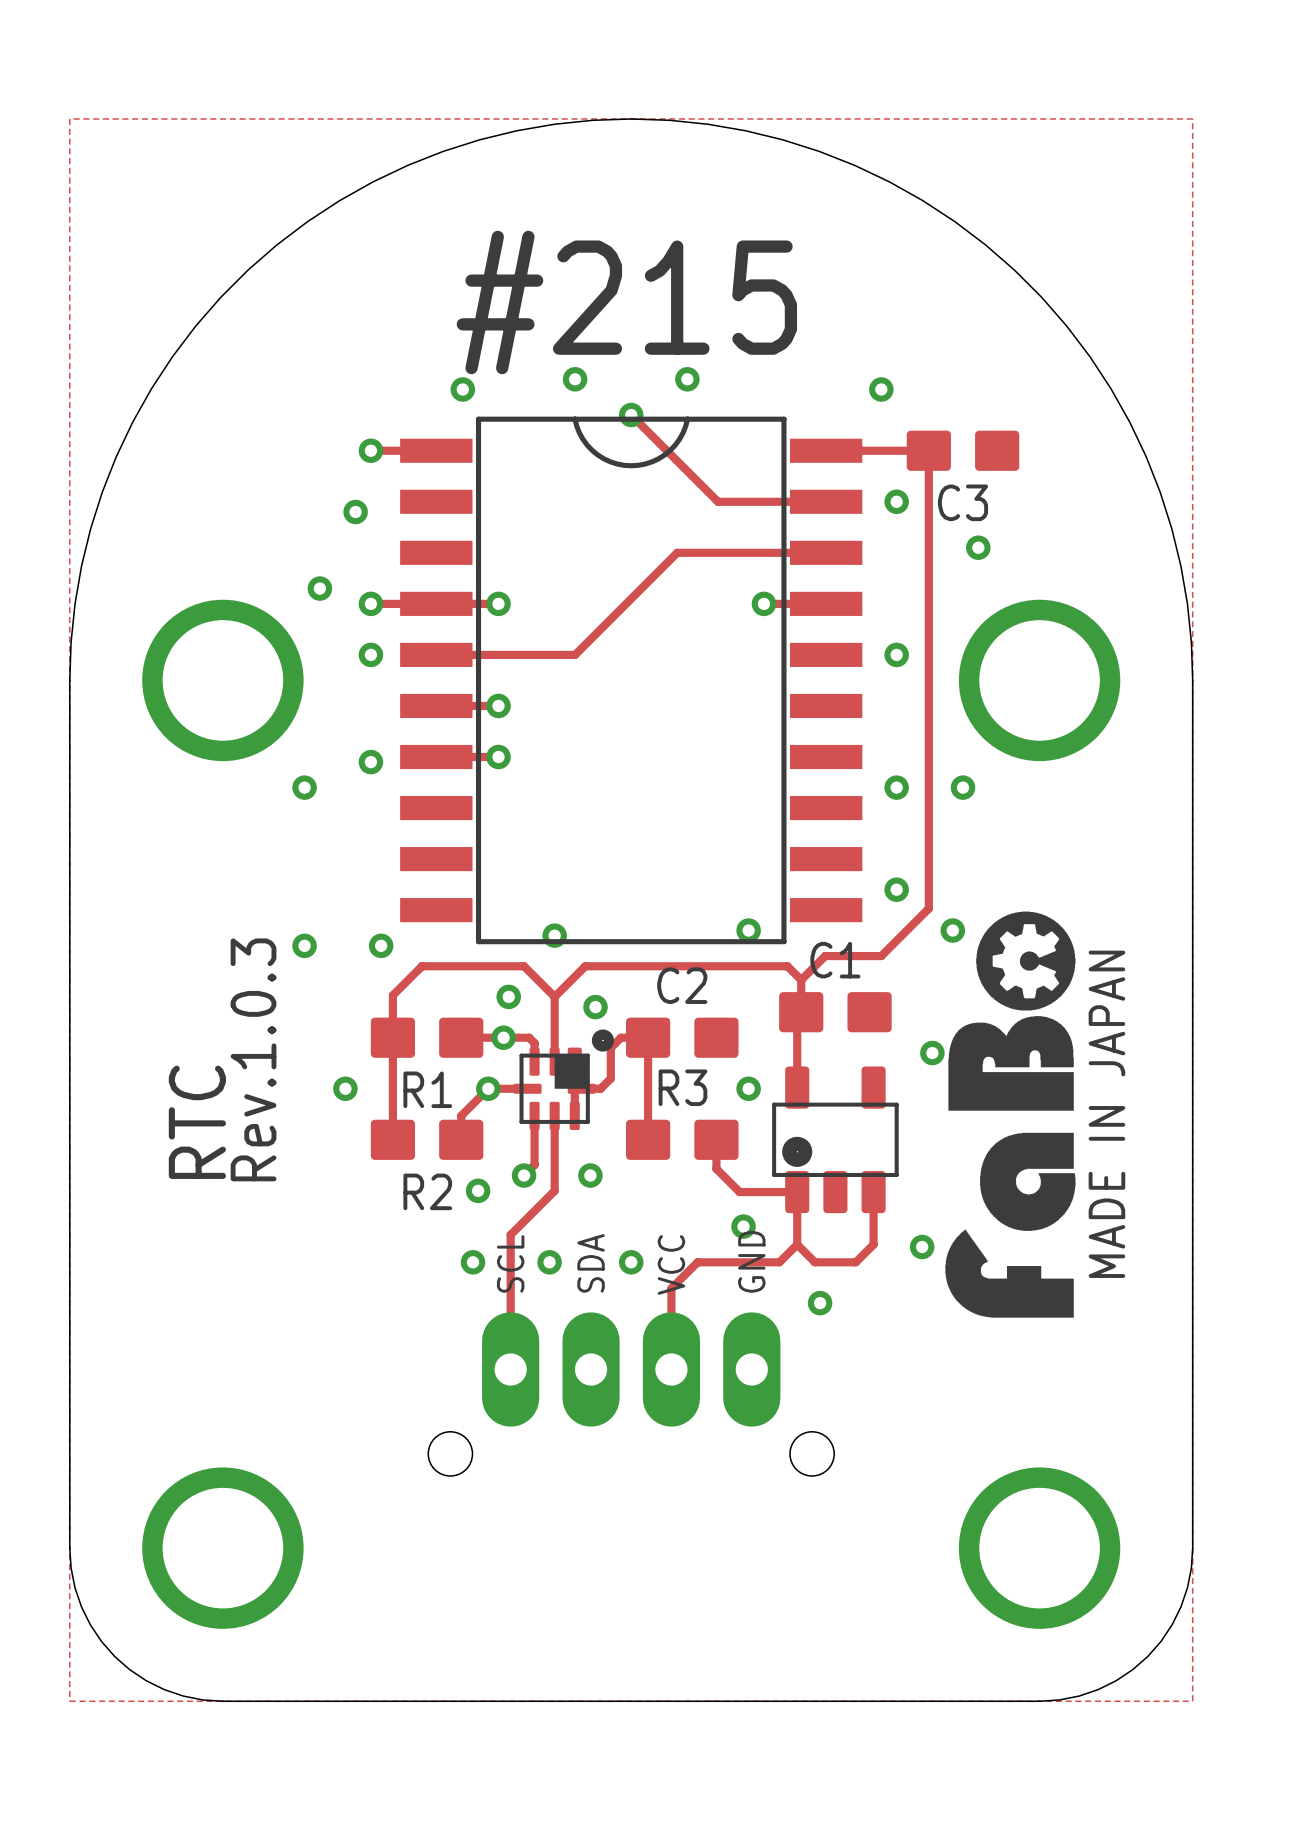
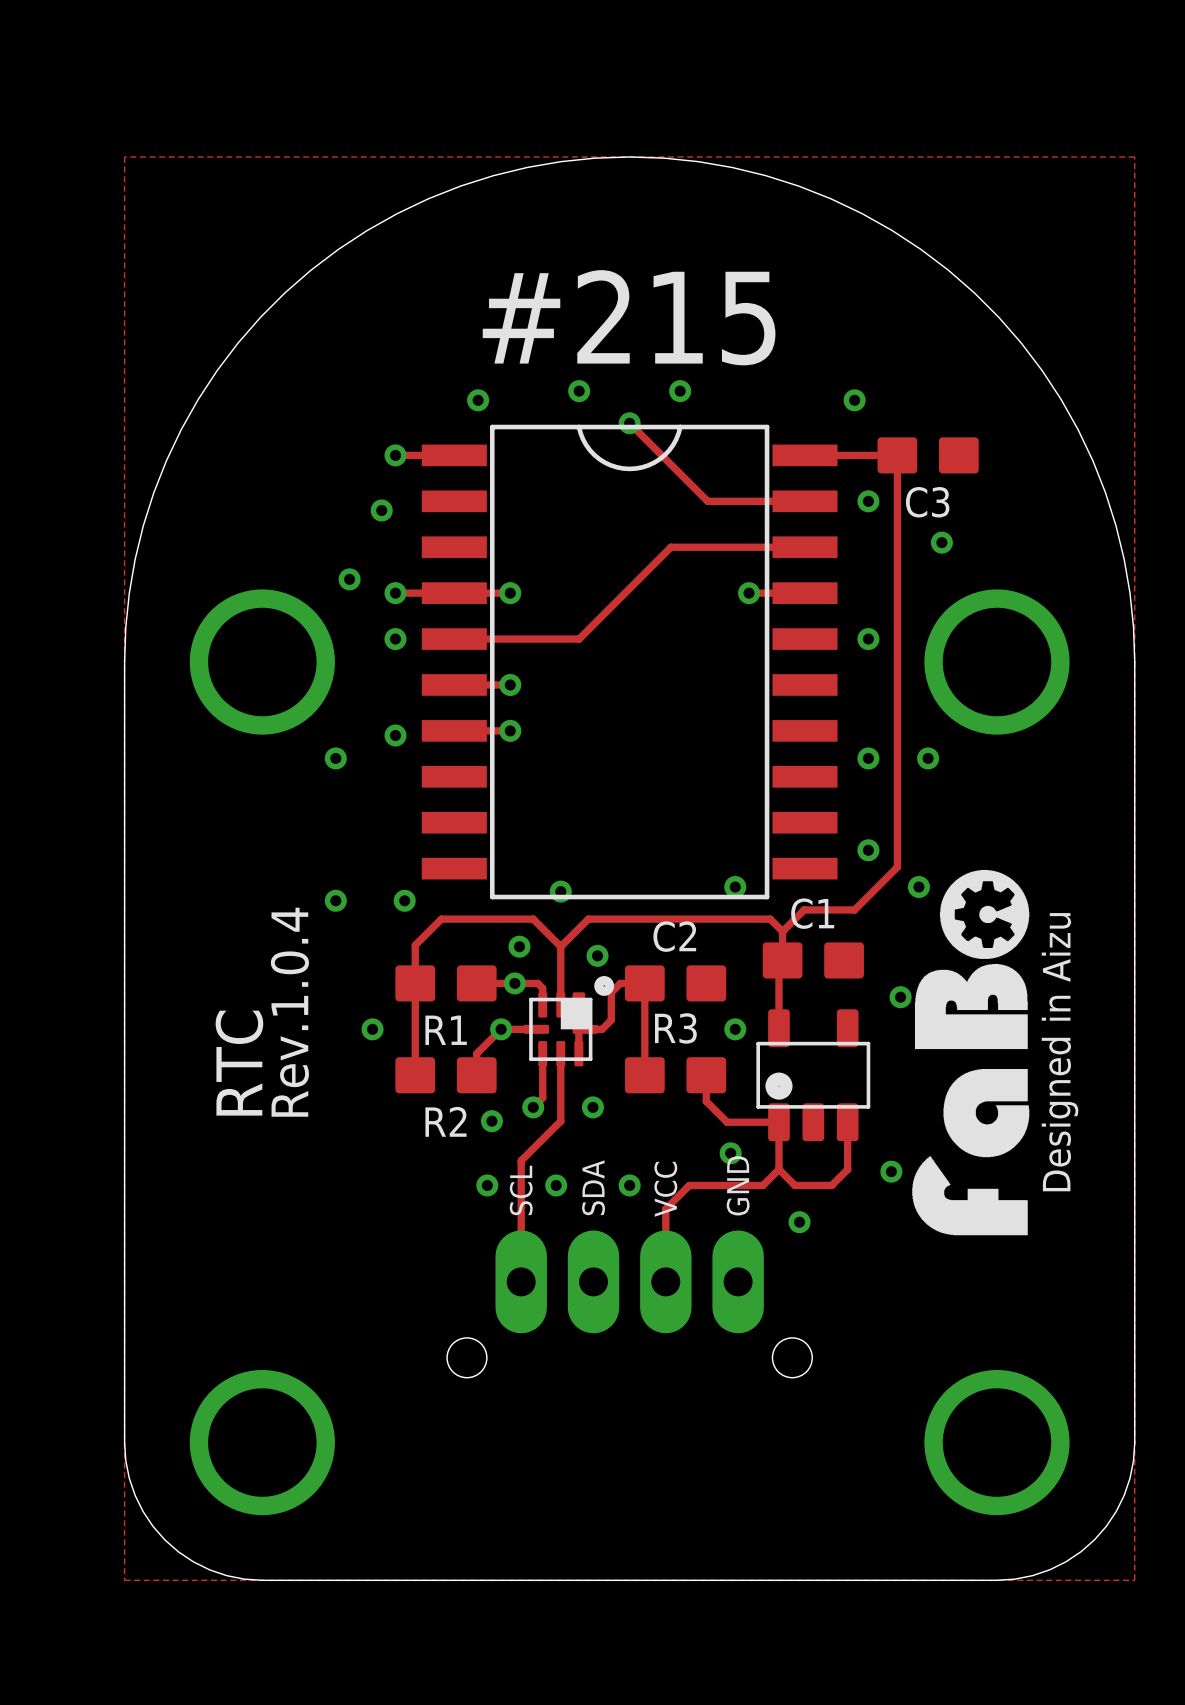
text: Rev.1.0.3 (253, 1059) -> Rev.1.0.4 (289, 1012)
text: MADE IN JAPAN (1106, 1114) -> Designed in Aizu (1060, 1052)

